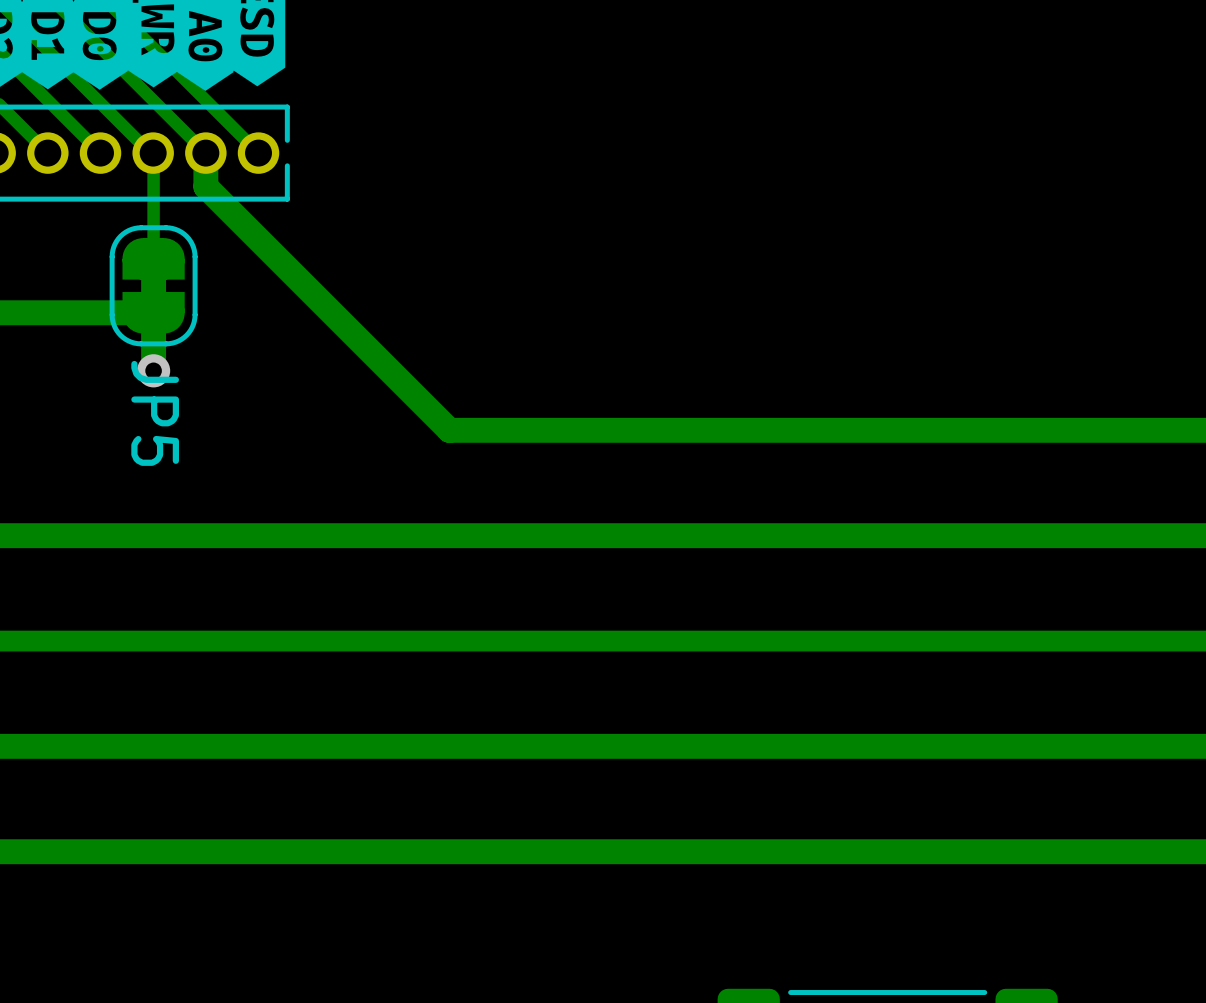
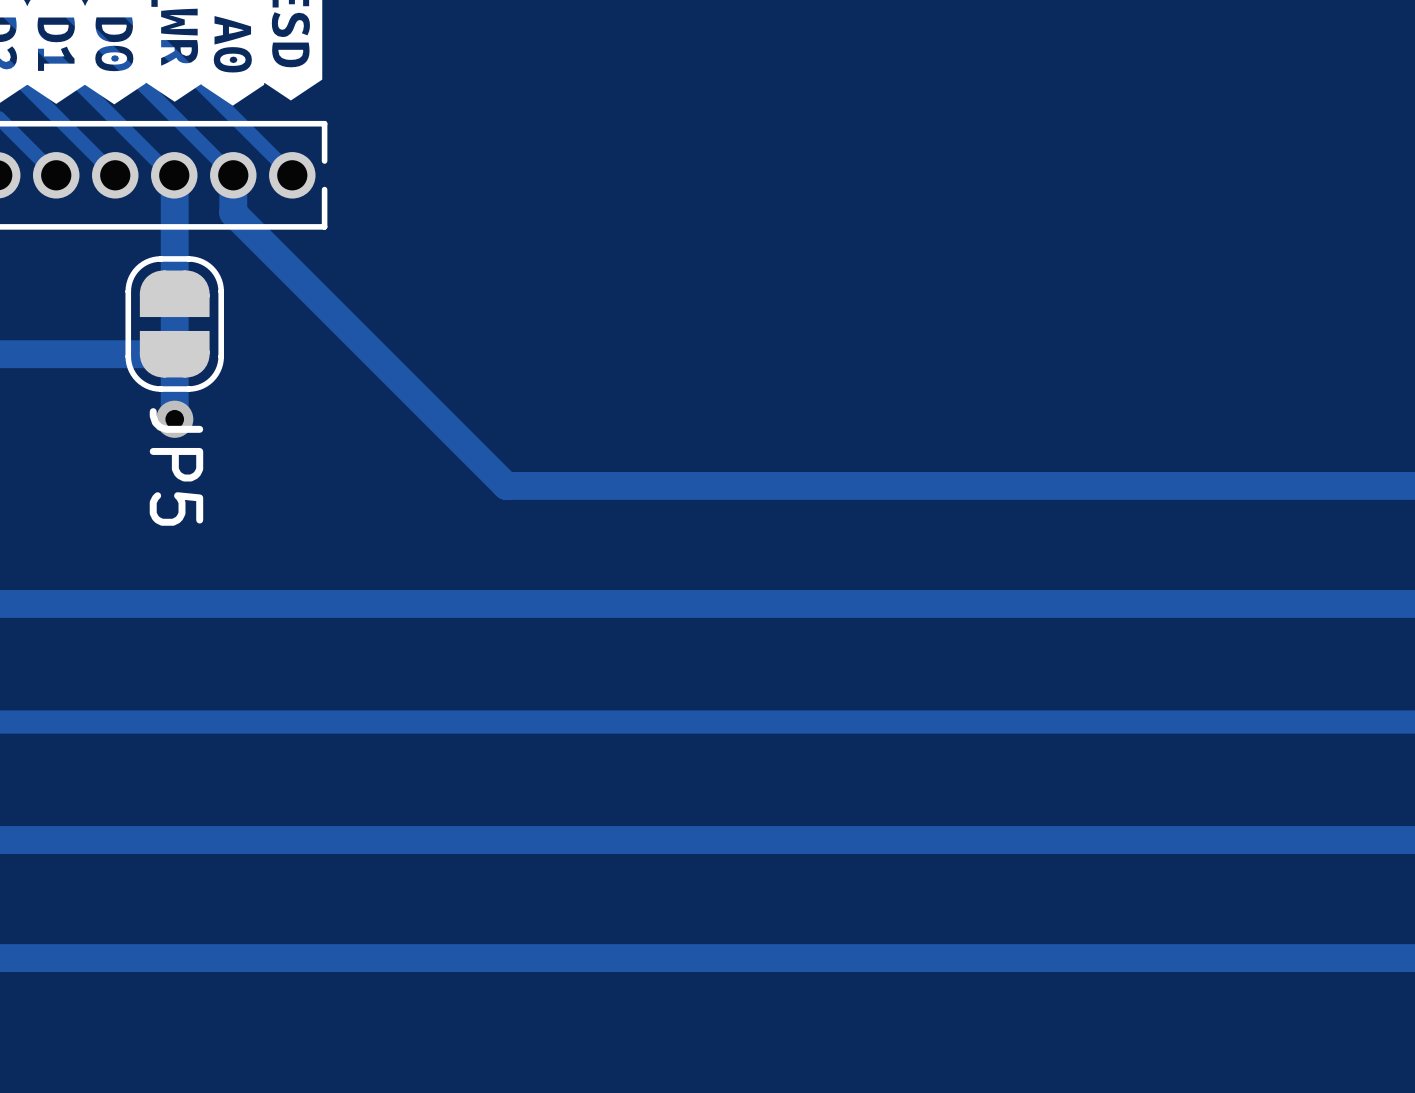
track width: thin (153, 153) (153, 258) -> thick (174, 175) (174, 293)

